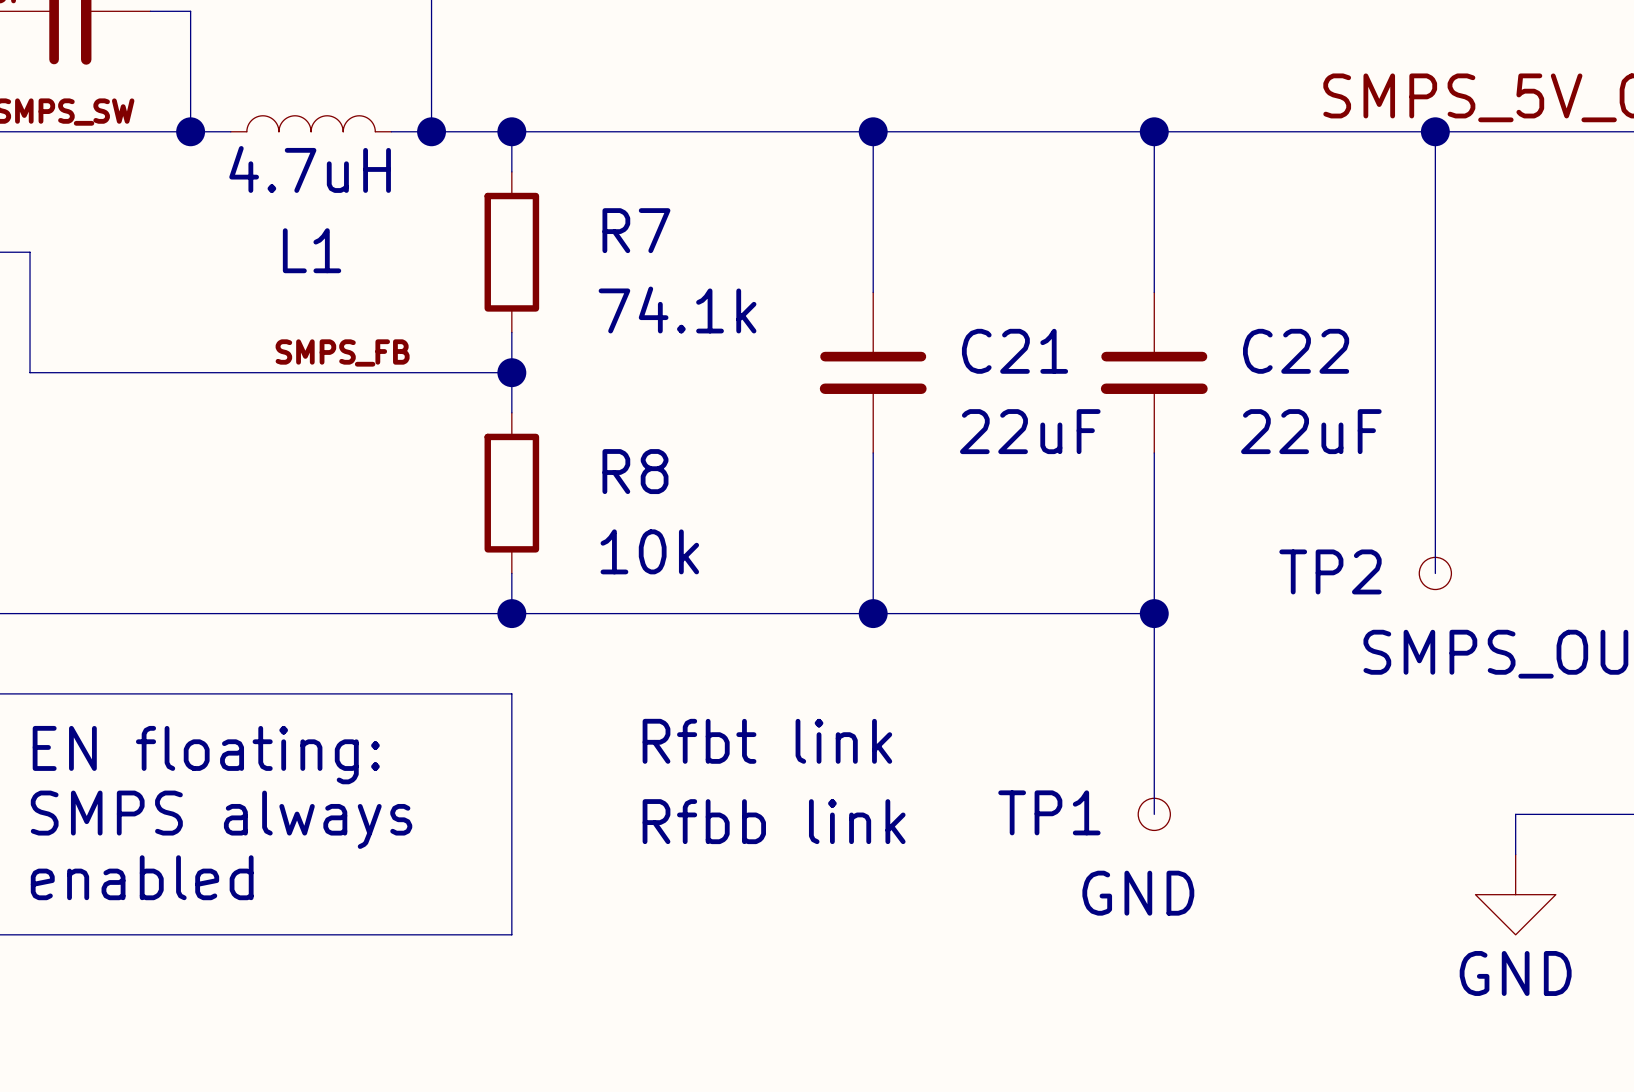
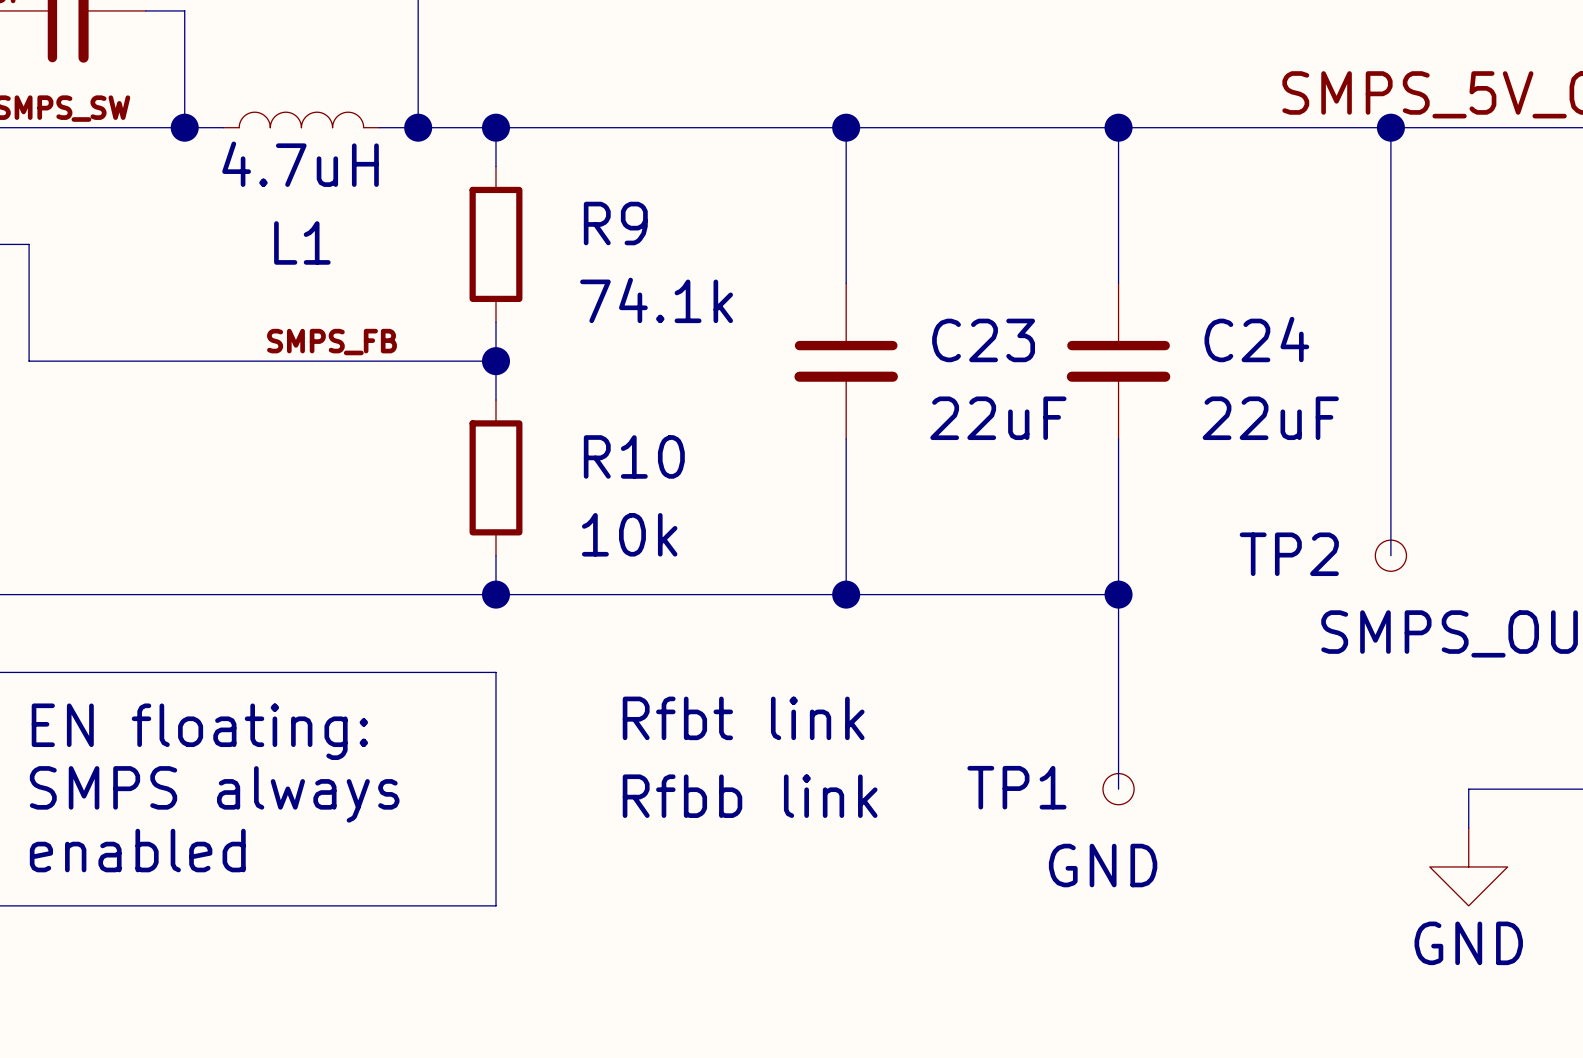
R7 name: R7 (636, 230) -> R9 (615, 223)
C21 name: C21 (1015, 351) -> C23 (983, 340)
C22 name: C22 (1296, 351) -> C24 (1256, 339)
R8 name: R8 (635, 471) -> R10 (634, 456)

